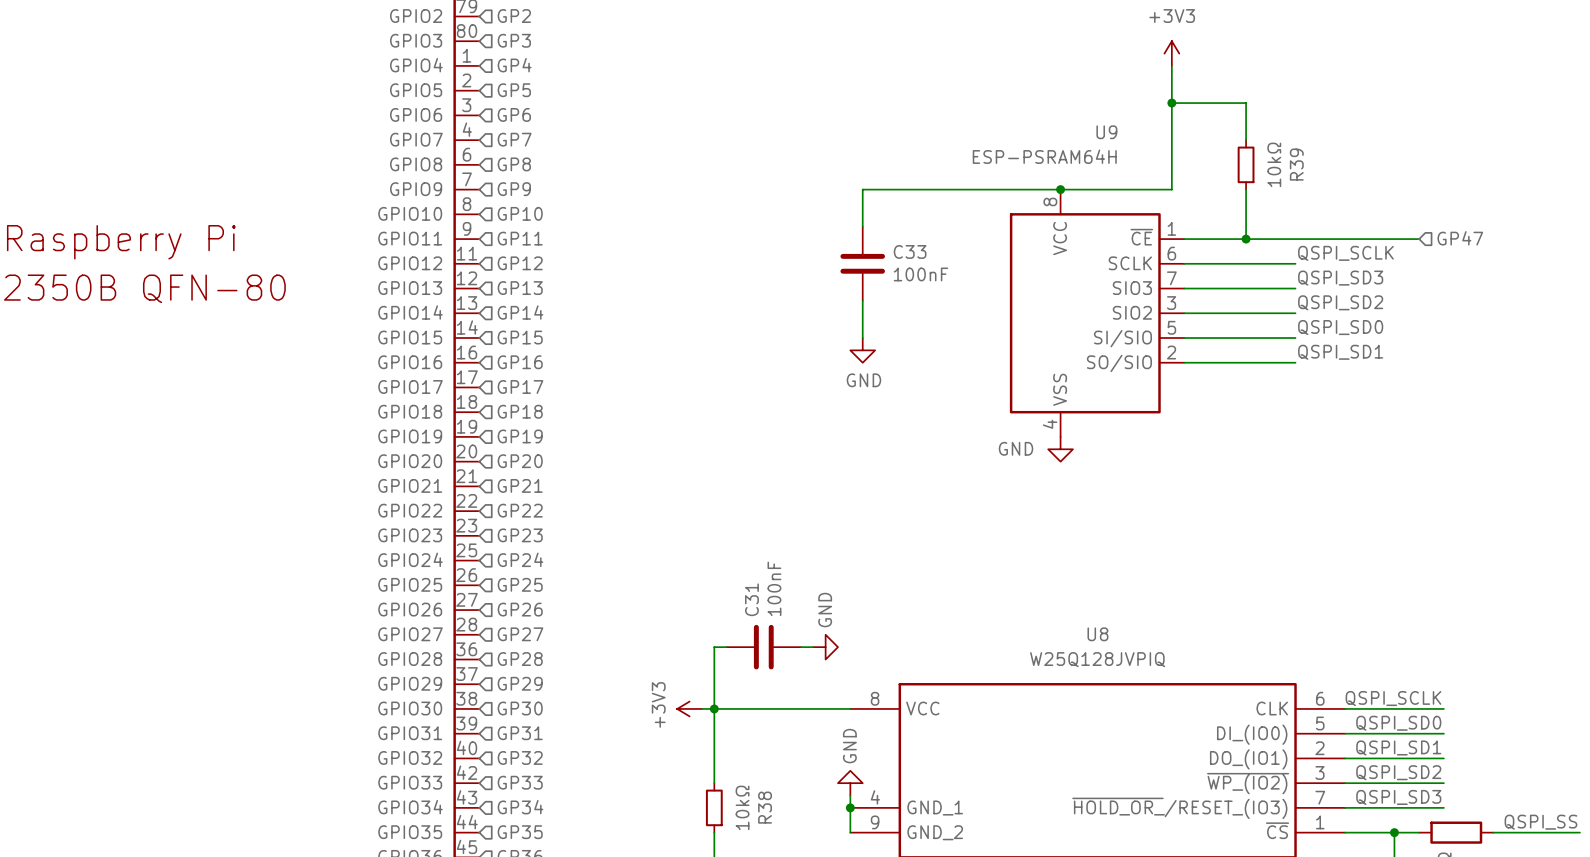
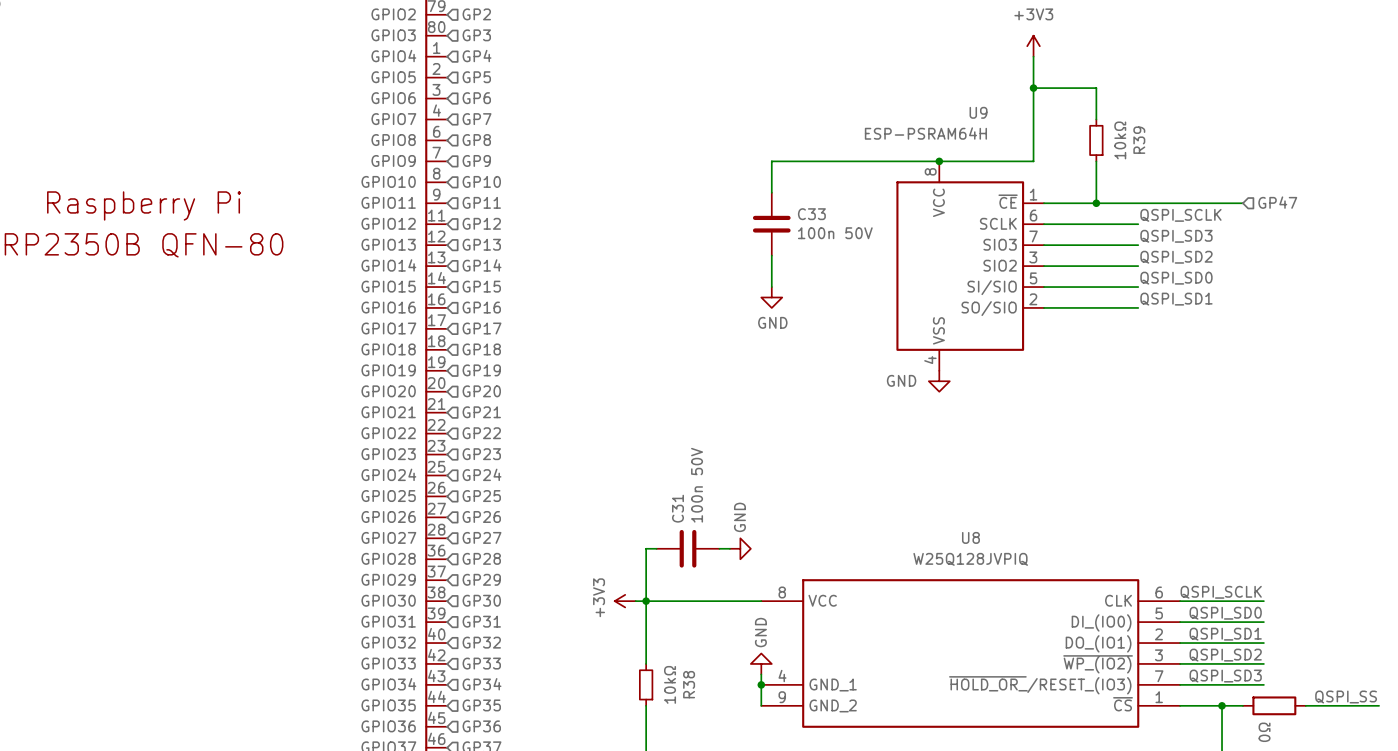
C33 value: 100nF (920, 274) -> 100n 50V (835, 233)
C31 value: 100nF (774, 588) -> 100n 50V (697, 485)

